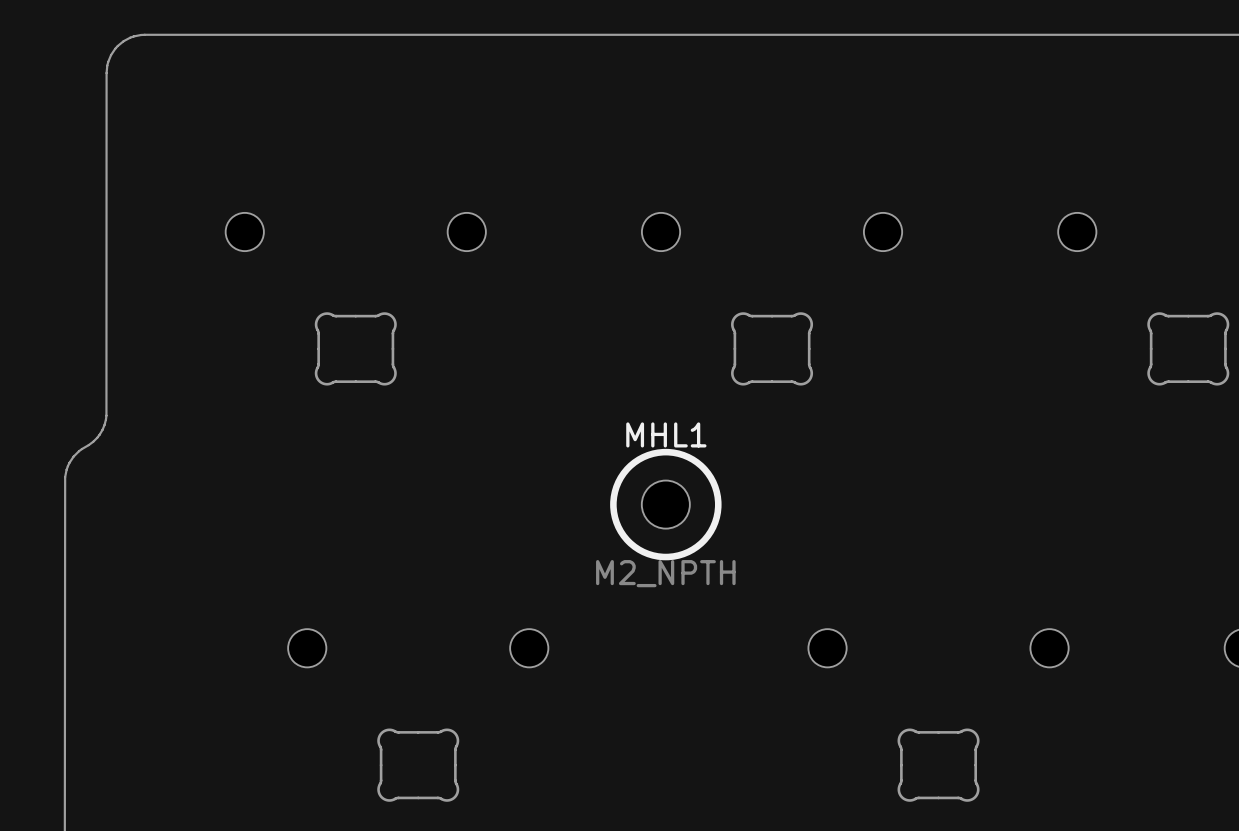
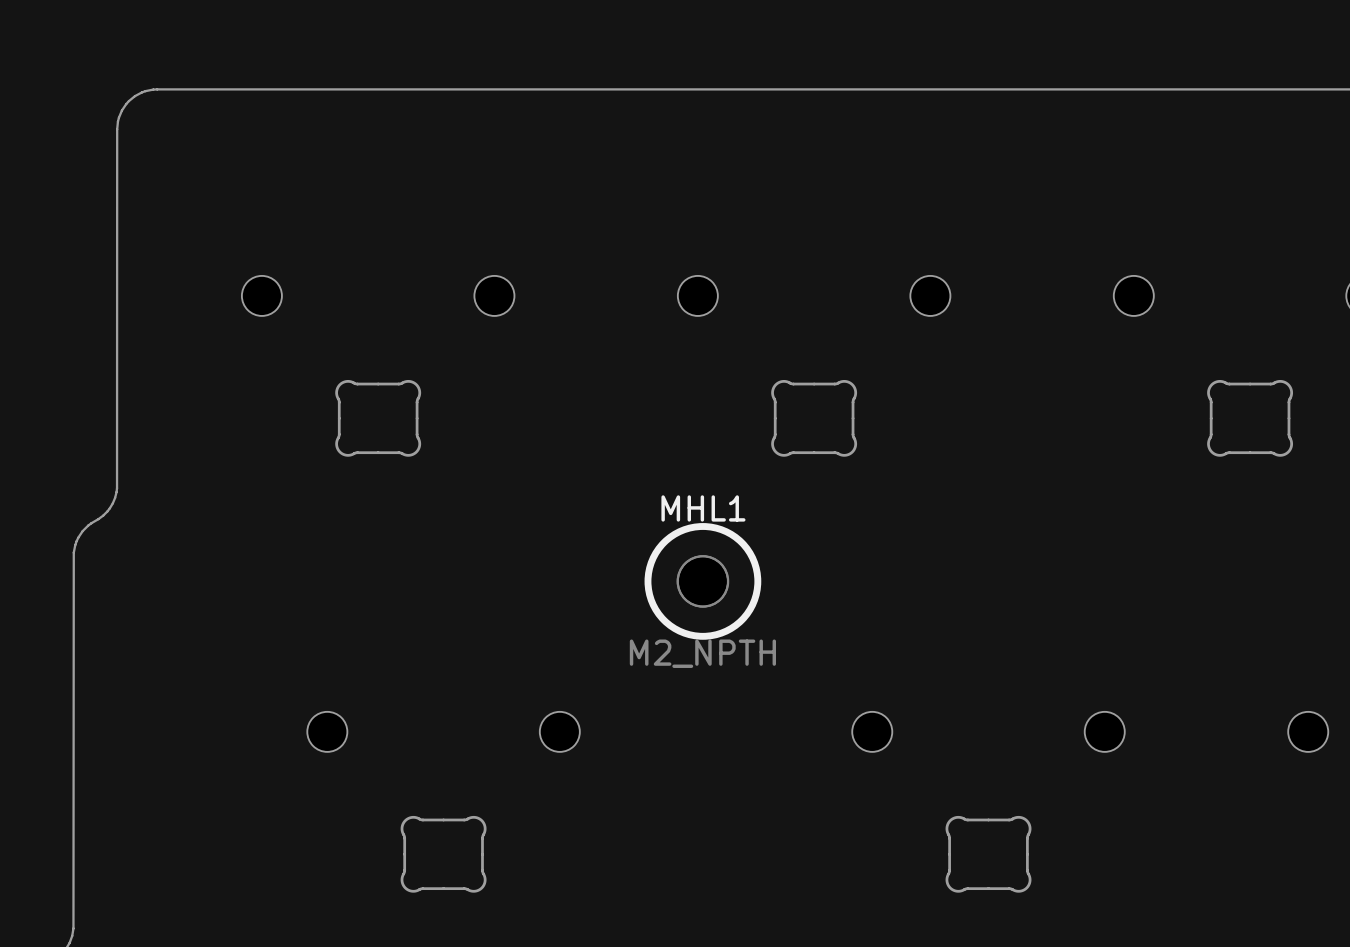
MHL1 footprint: [610, 448, 722, 561] -> [644, 523, 762, 640]

